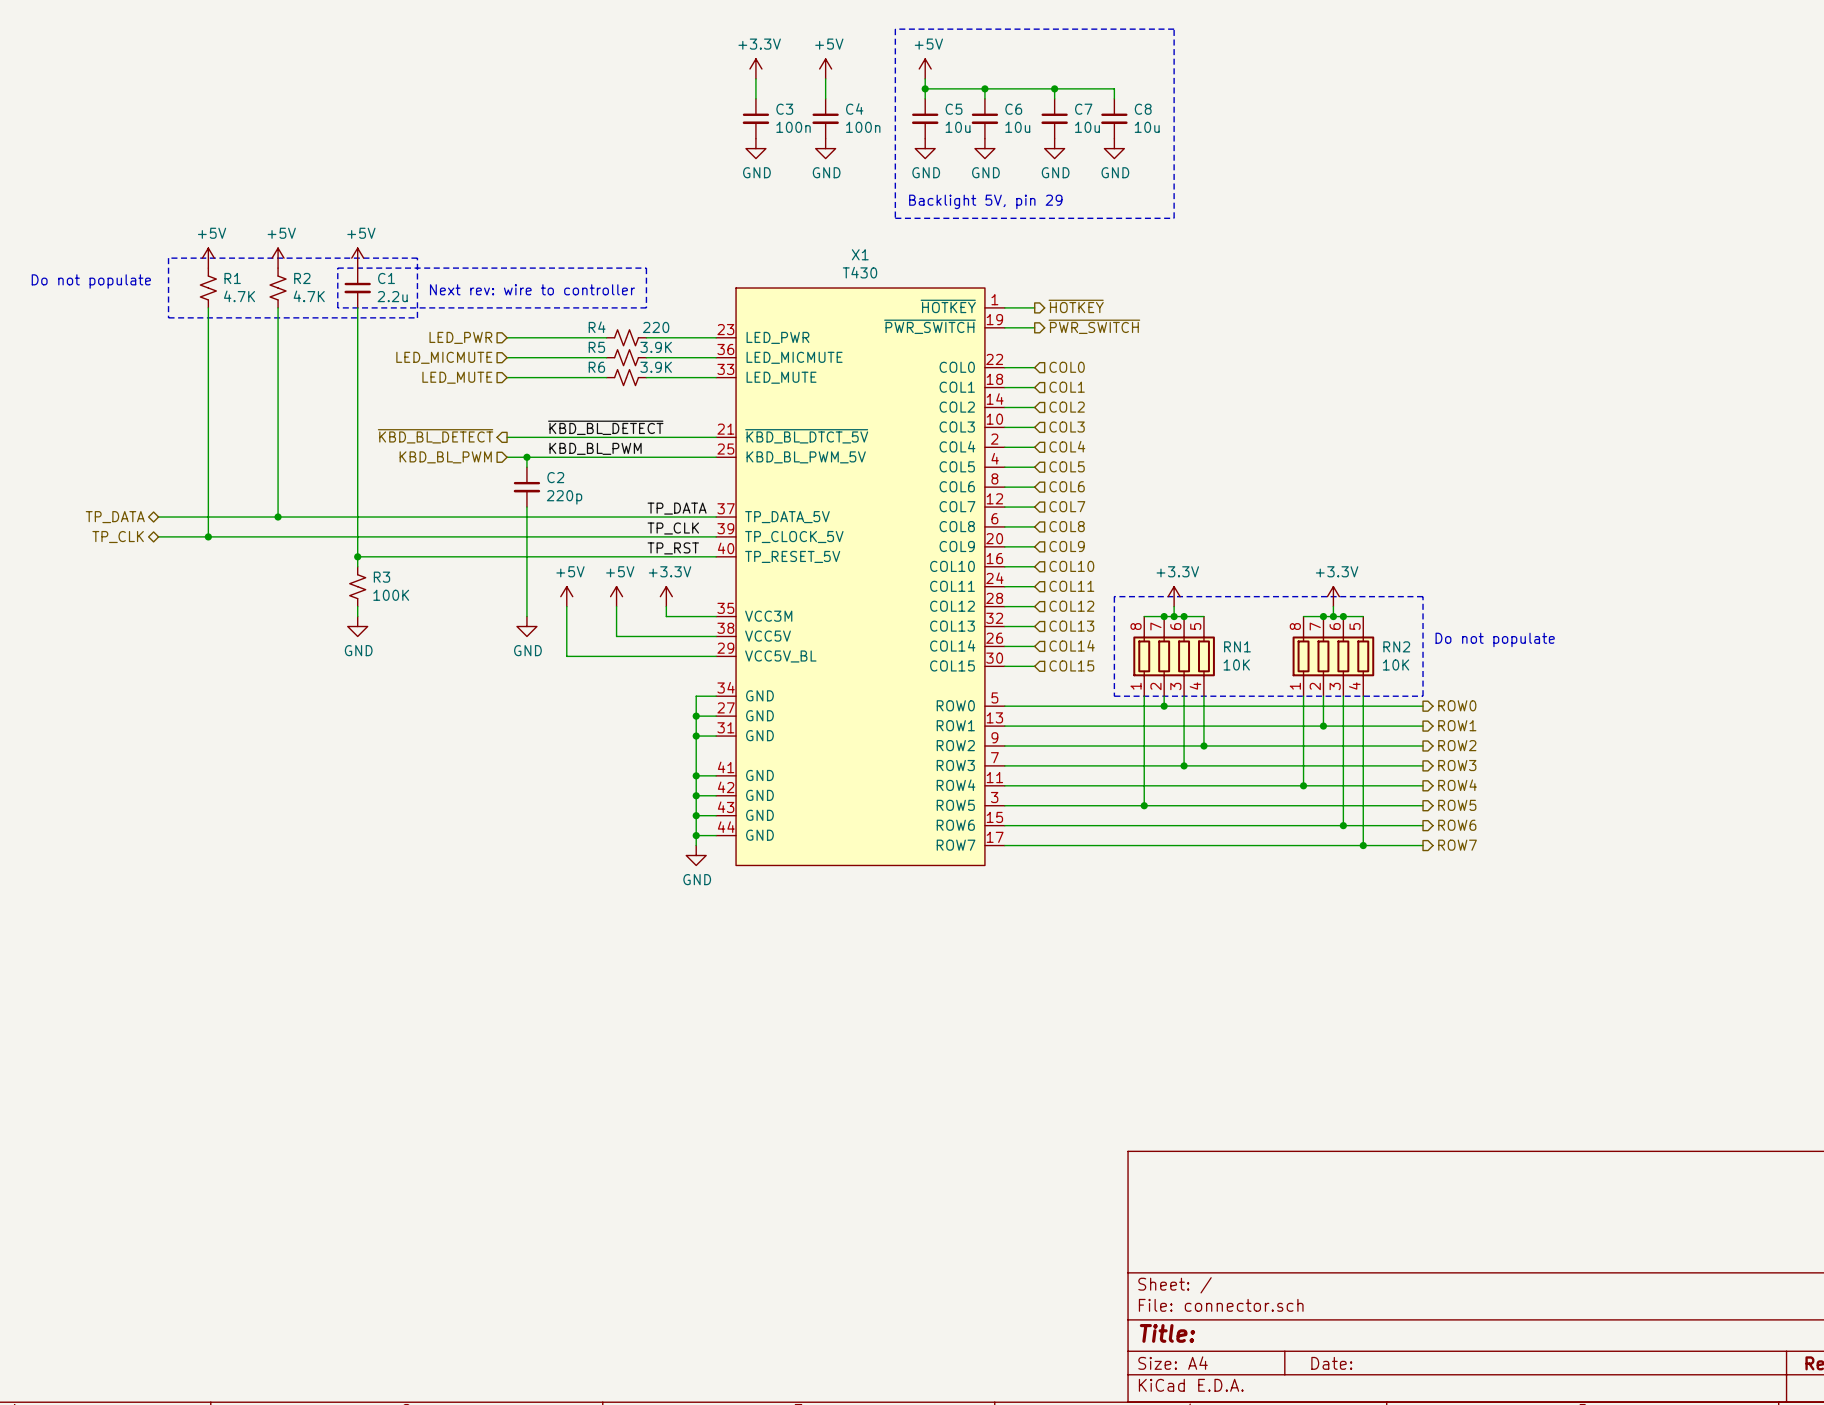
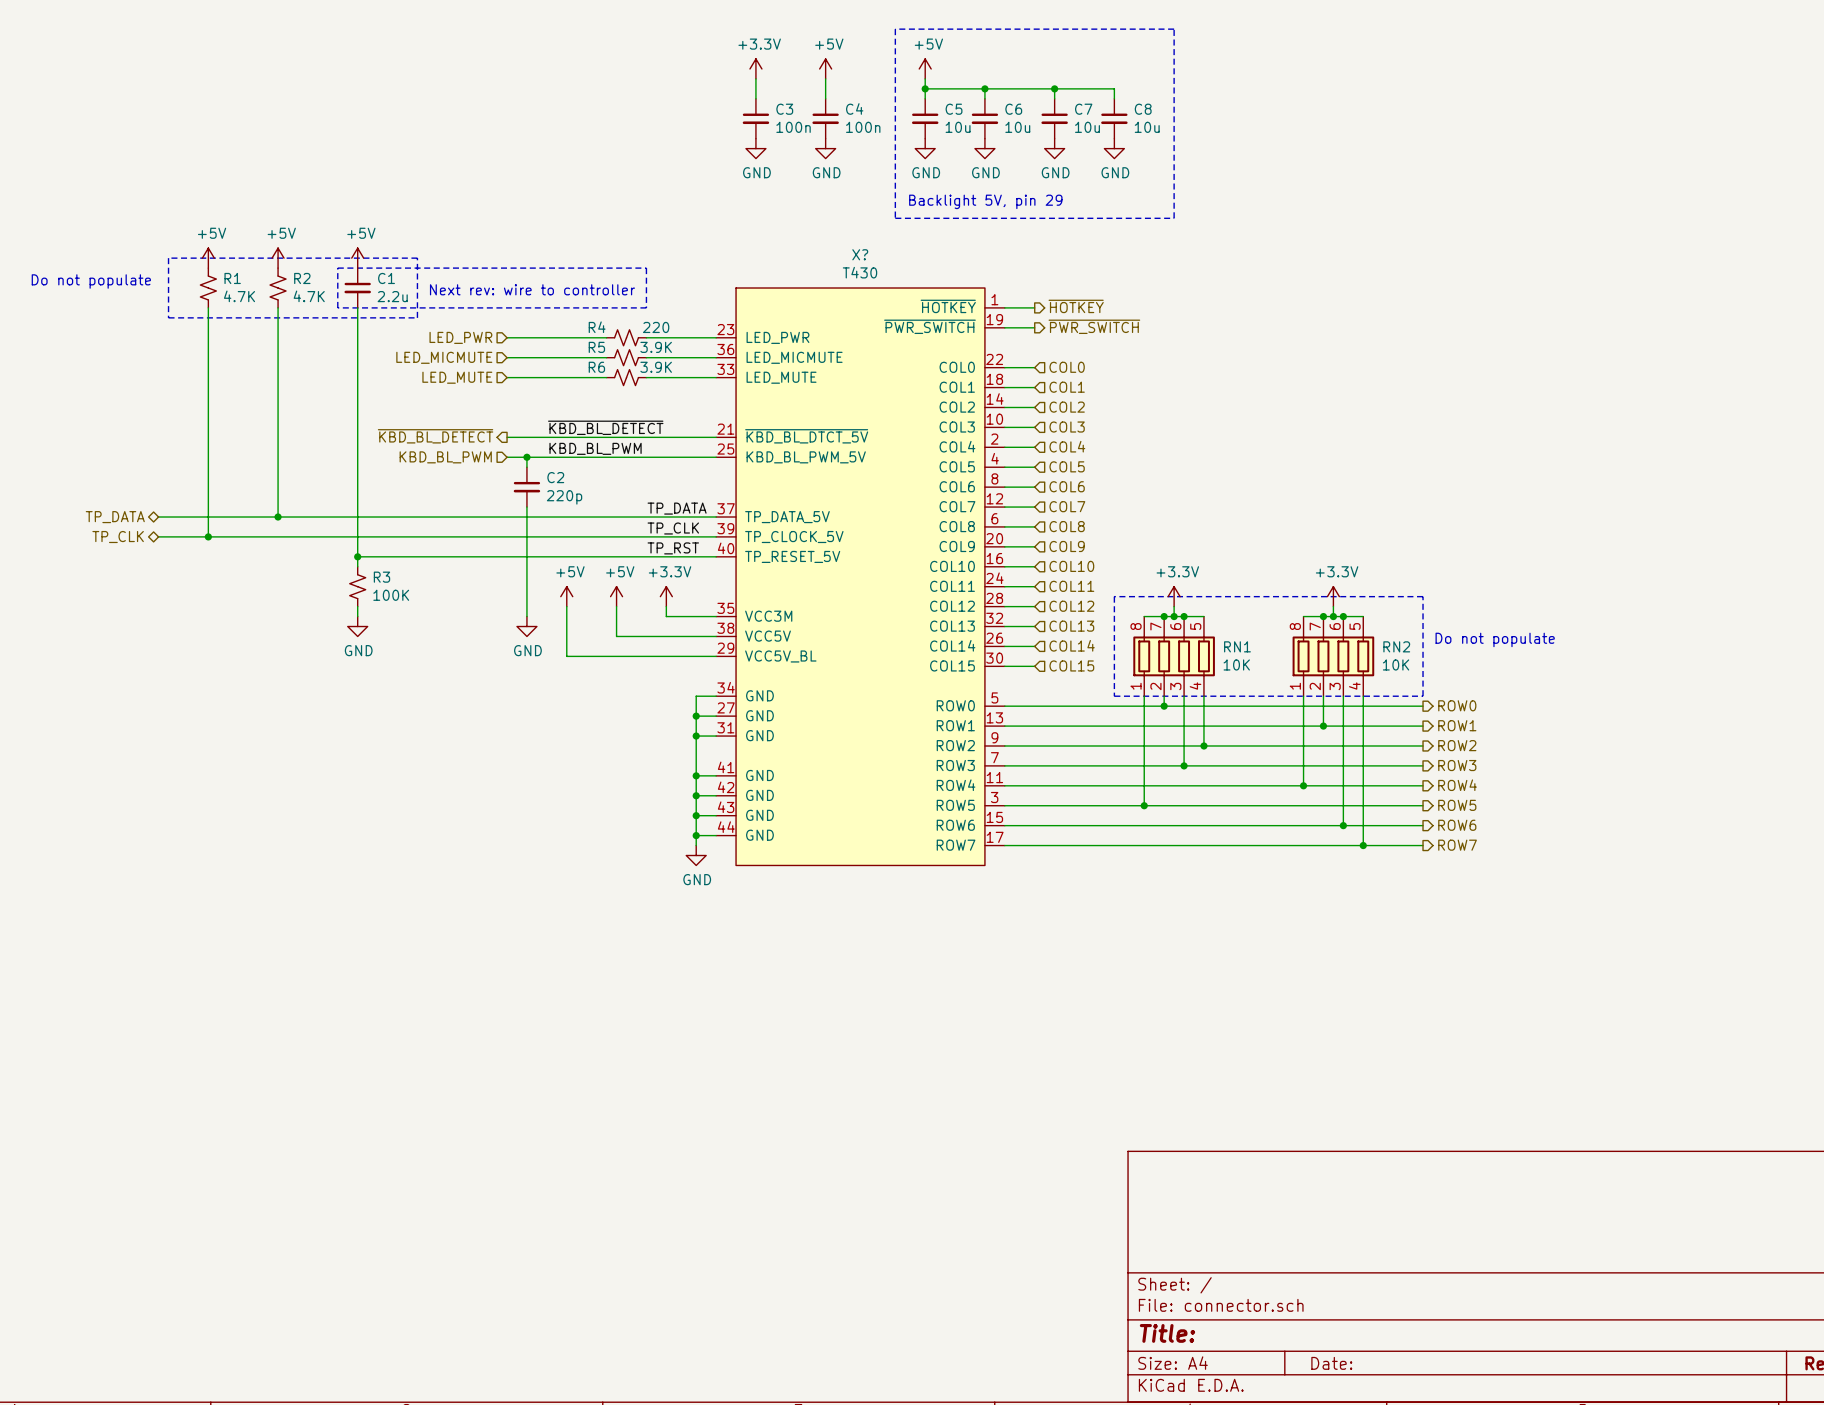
X1 name: X1 (860, 254) -> X? (860, 254)

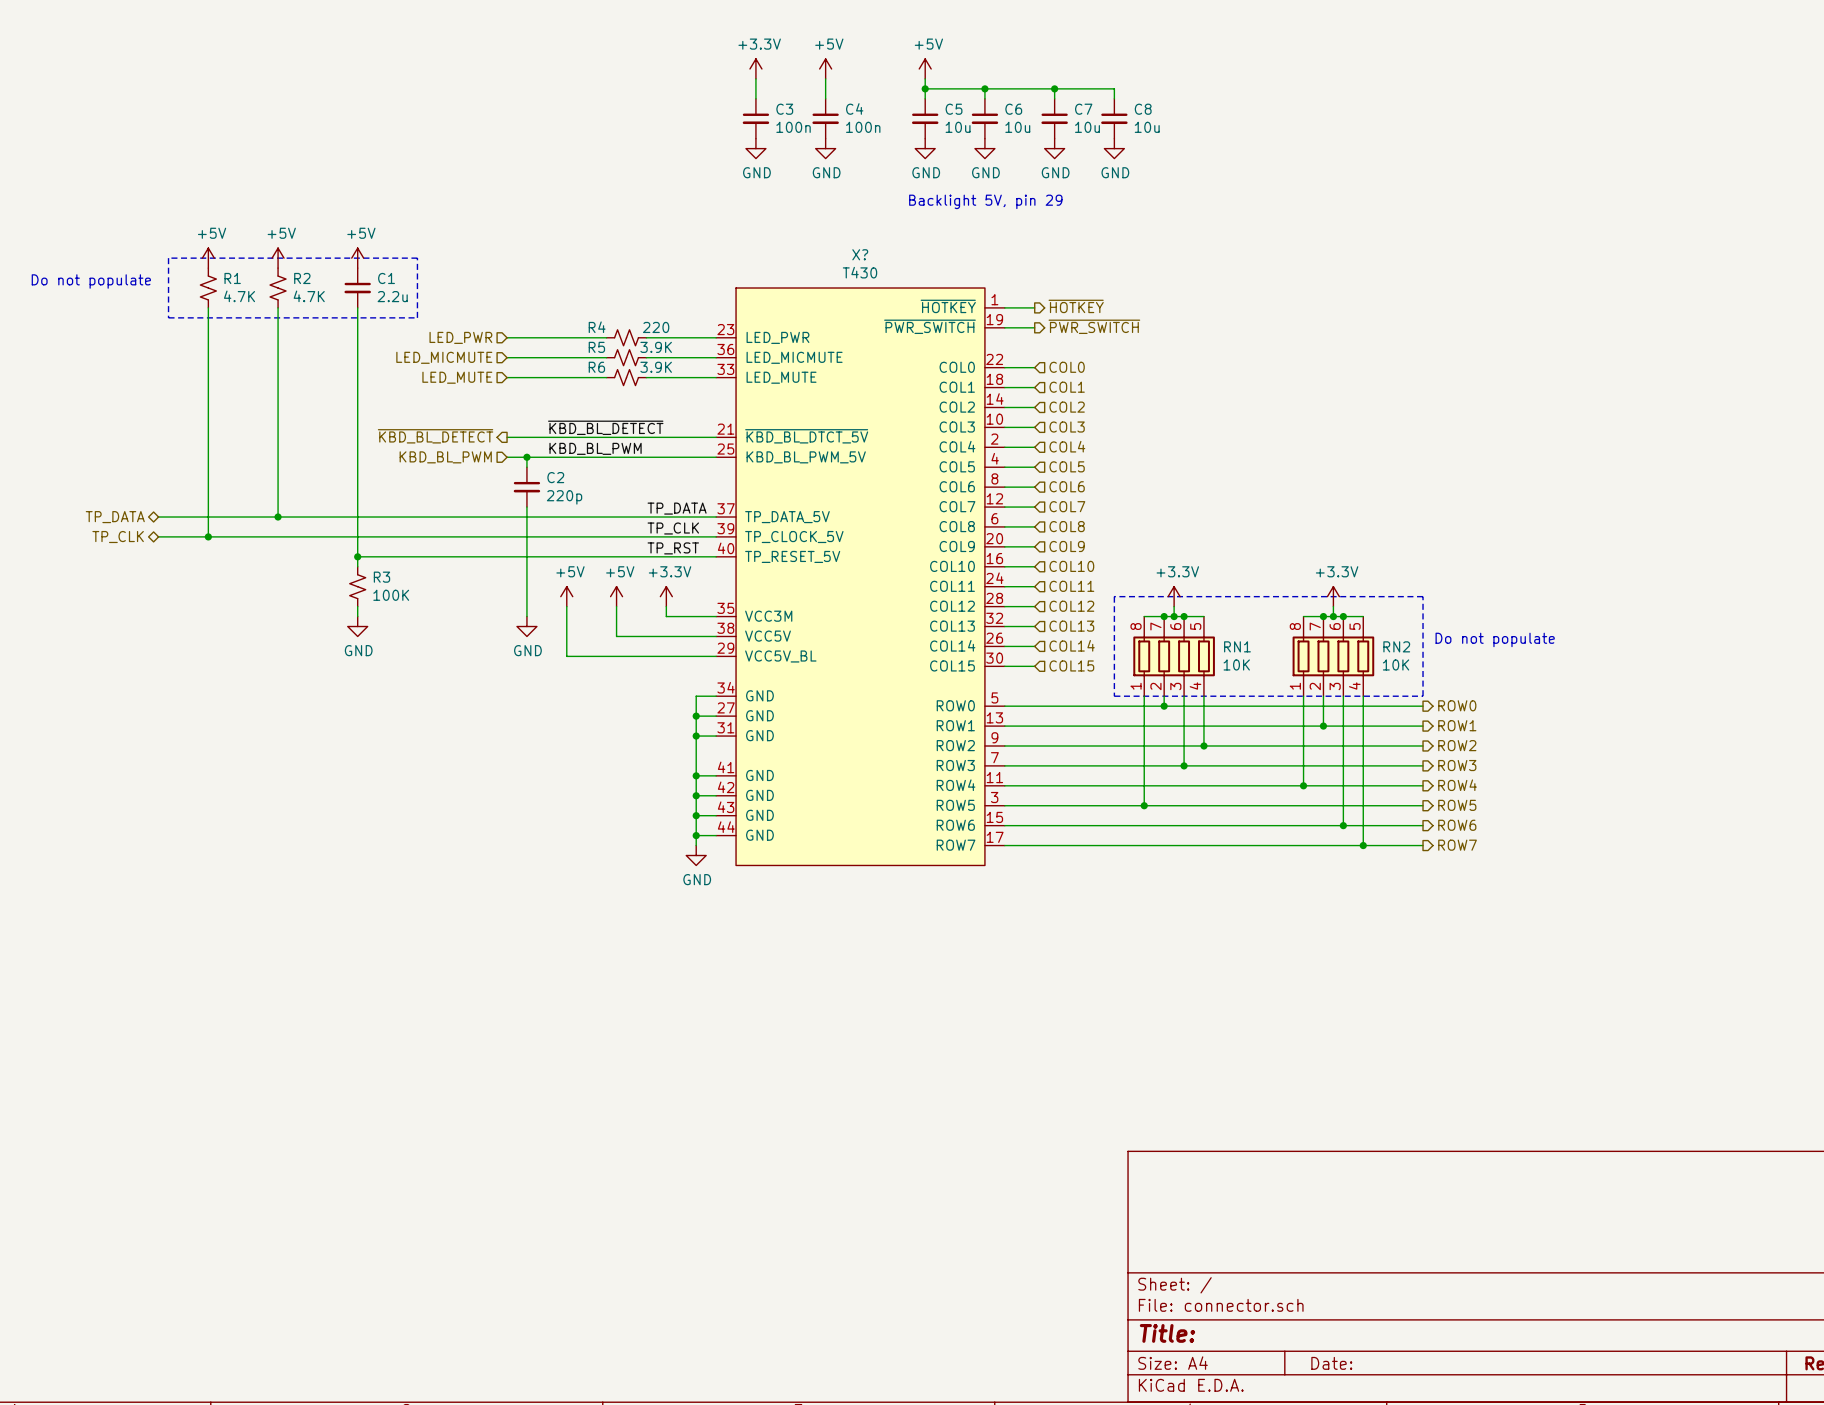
line: (895, 29) (895, 218) (1174, 218) (1174, 29) (895, 29) -> none
line: (337, 268) (646, 268) (646, 307) (337, 307) (337, 268) -> none
text: Next rev: wire to controller (532, 289) -> none

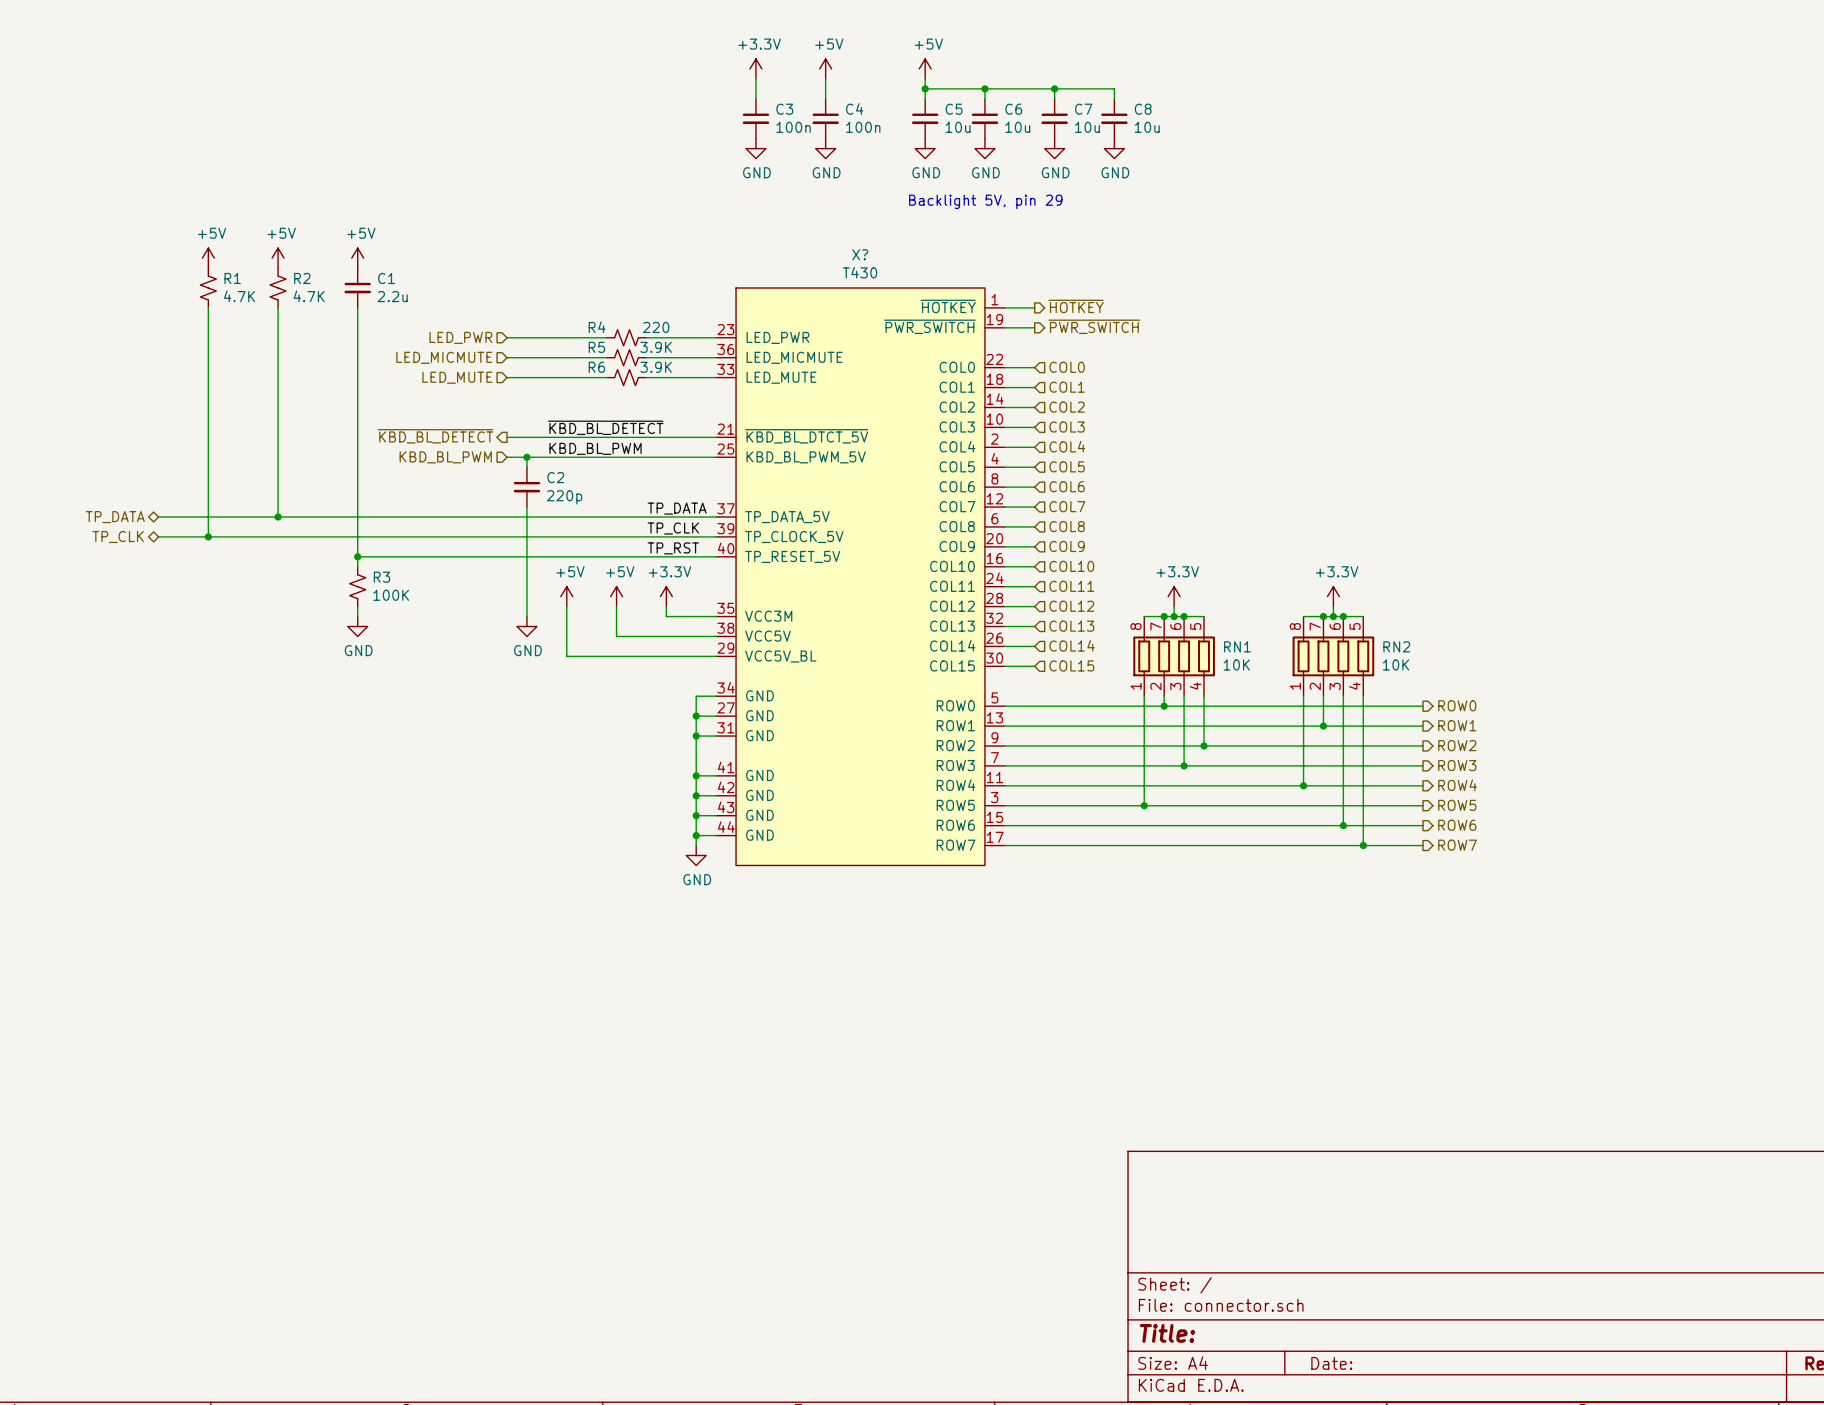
line: (168, 258) (168, 317) (417, 317) (417, 258) (168, 258) -> none
text: Do not populate (91, 281) -> none
line: (1114, 596) (1423, 596) (1423, 696) (1114, 696) (1114, 596) -> none
text: Do not populate (1495, 639) -> none

